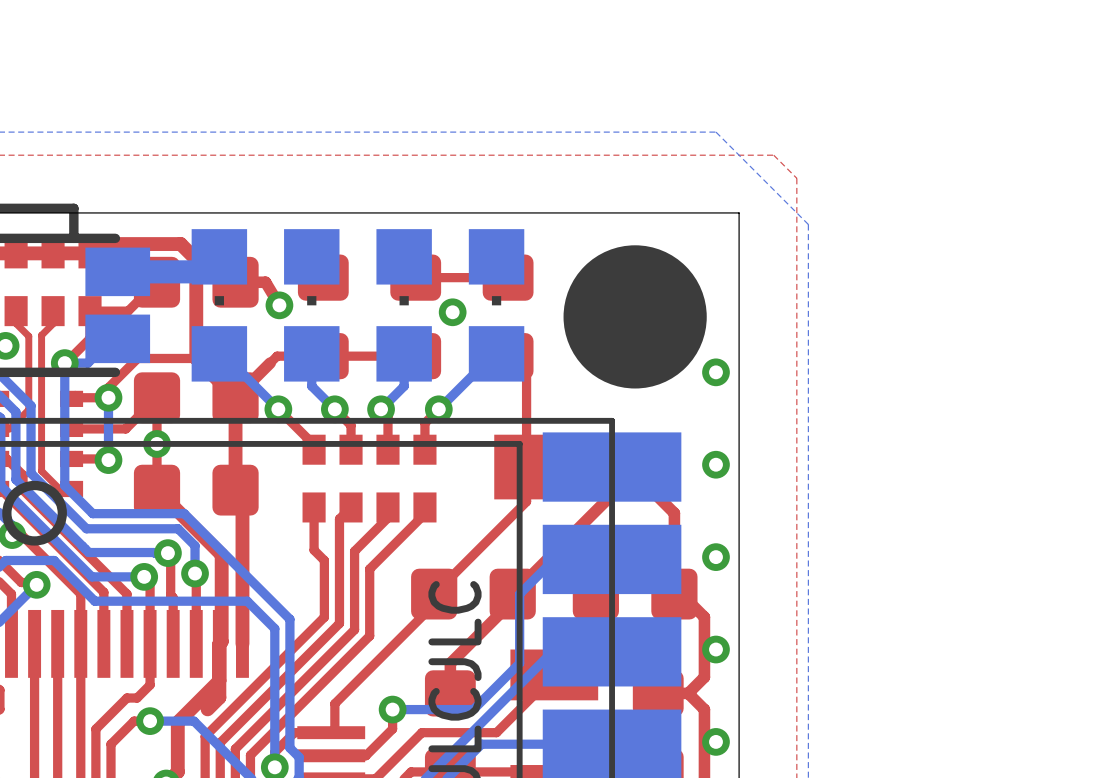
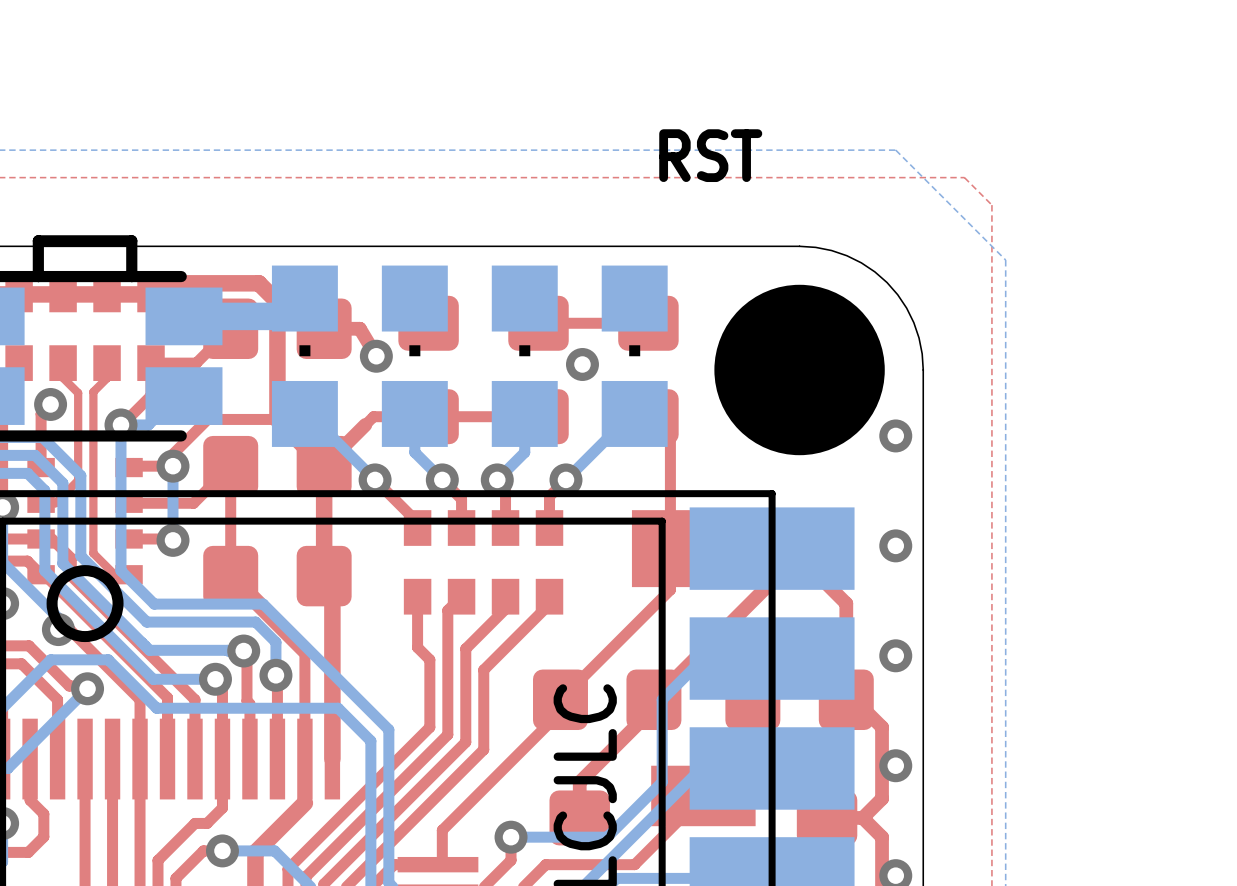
text: none -> RST (710, 155)
board edge: (635, 212) (739, 212) (739, 316) -> (799, 246) (815, 247) (846, 255) (861, 262) (887, 282) (906, 308) (913, 322) (922, 353) (923, 369)
via: (157, 443) -> none
top track: (219, 552) (221, 554) (219, 697) (207, 709) -> (304, 650) (304, 759)

